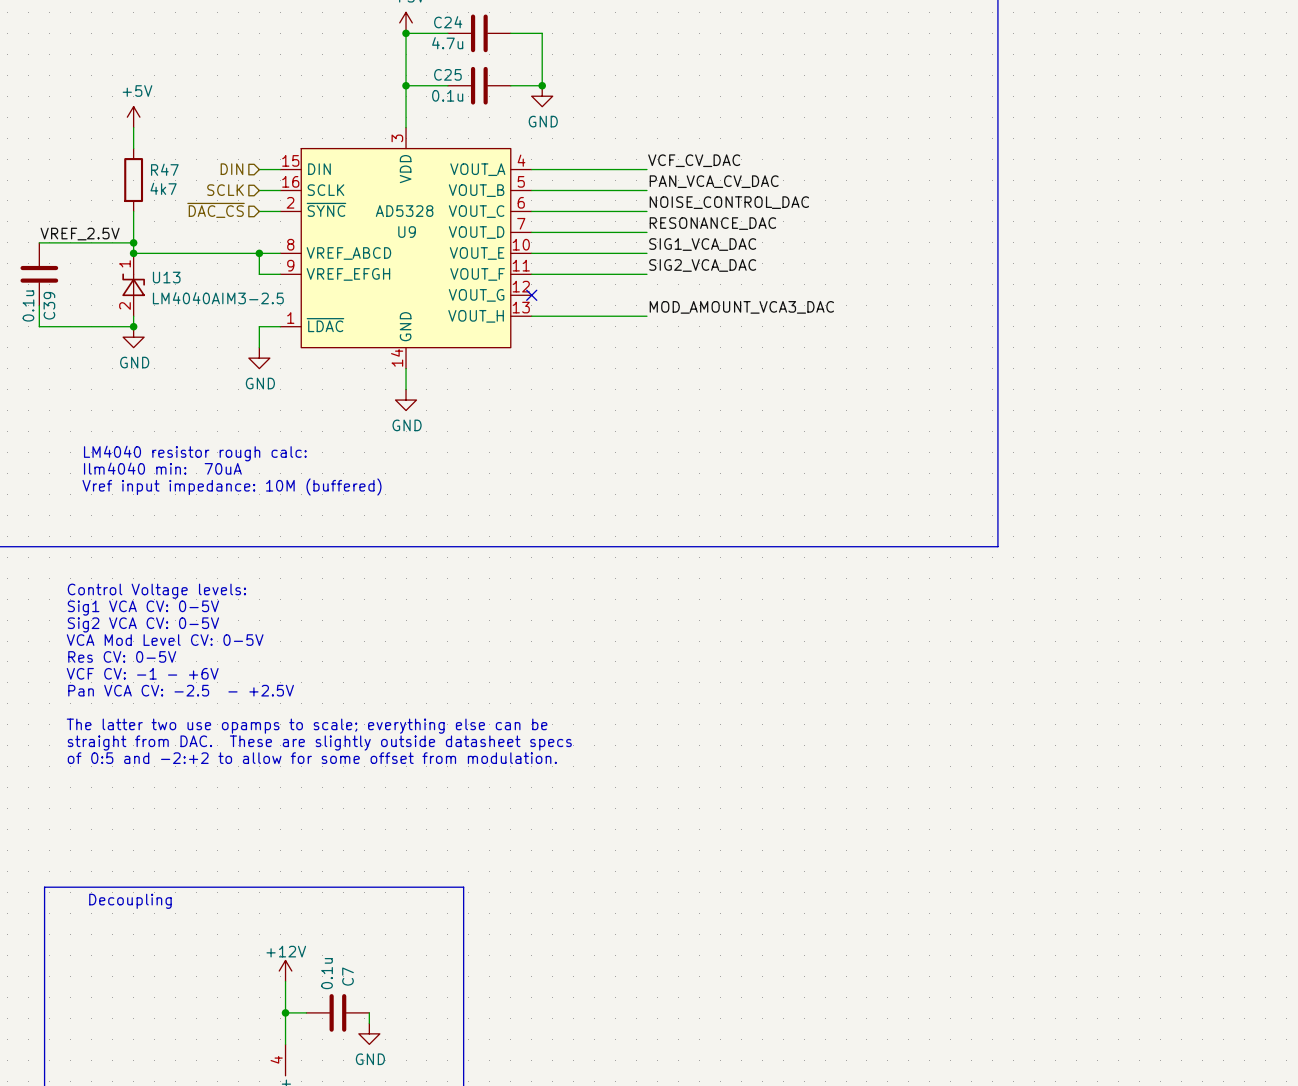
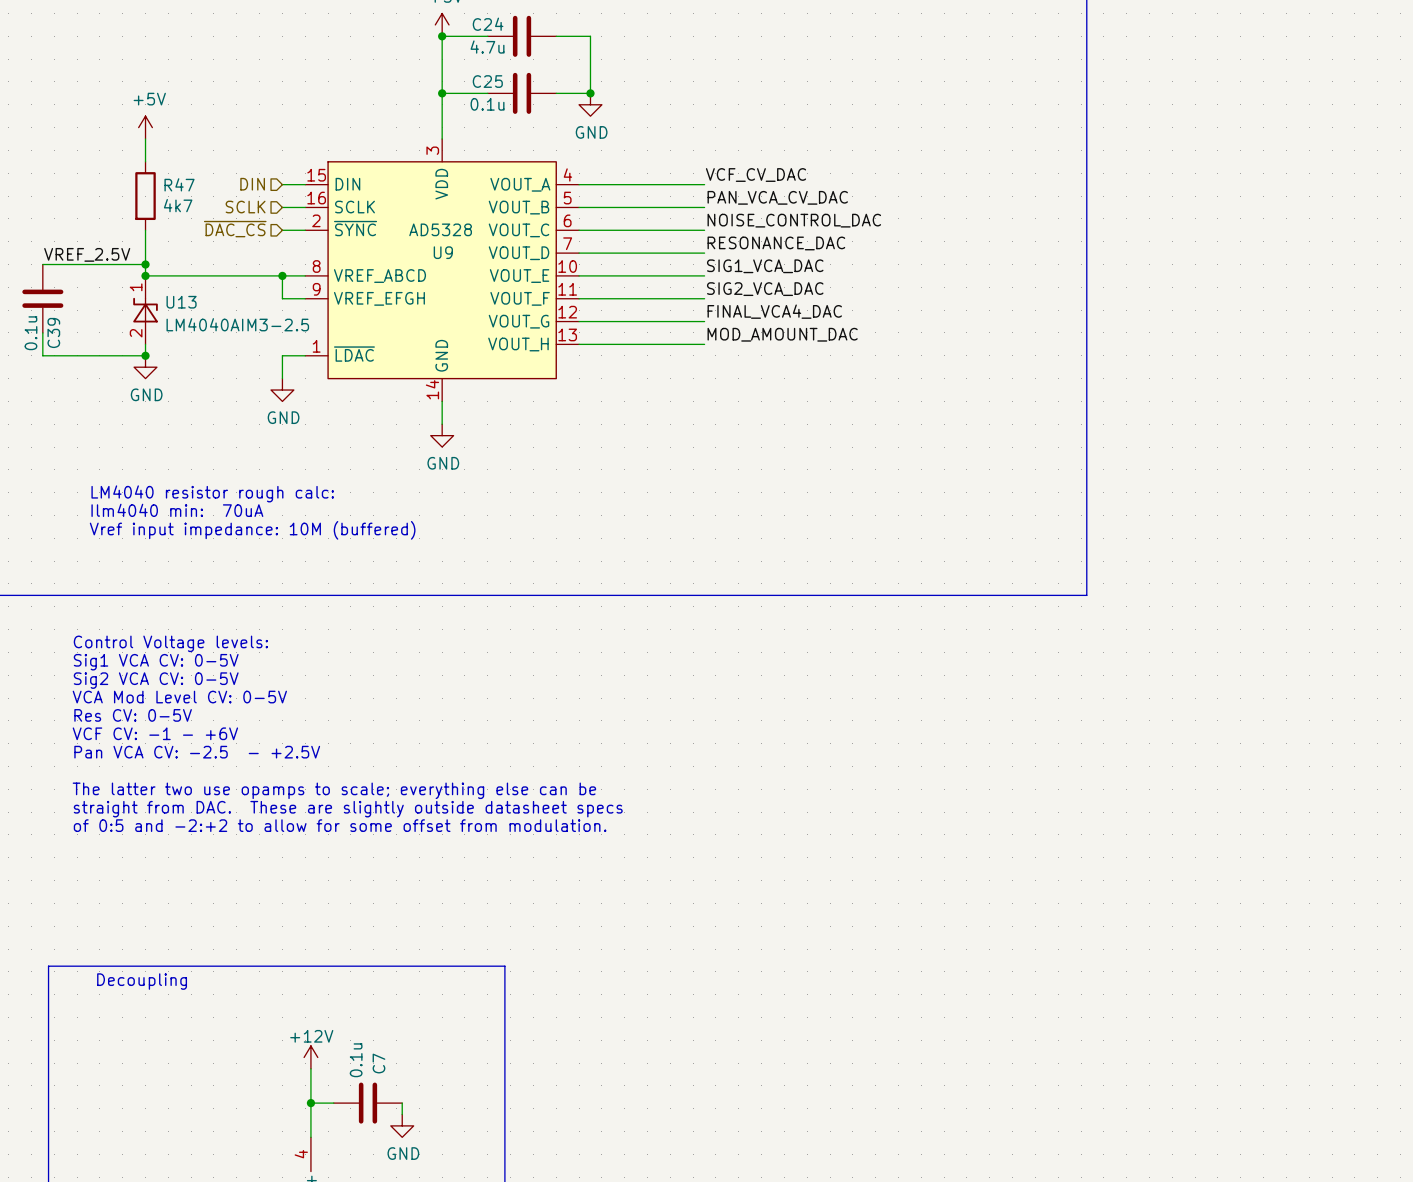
label: none -> FINAL_VCA4_DAC (774, 311)
wire: none -> (579, 321) (704, 321)
no-connect mark: (531, 295) -> none
label: MOD_AMOUNT_VCA3_DAC (741, 307) -> MOD_AMOUNT_DAC (782, 334)

